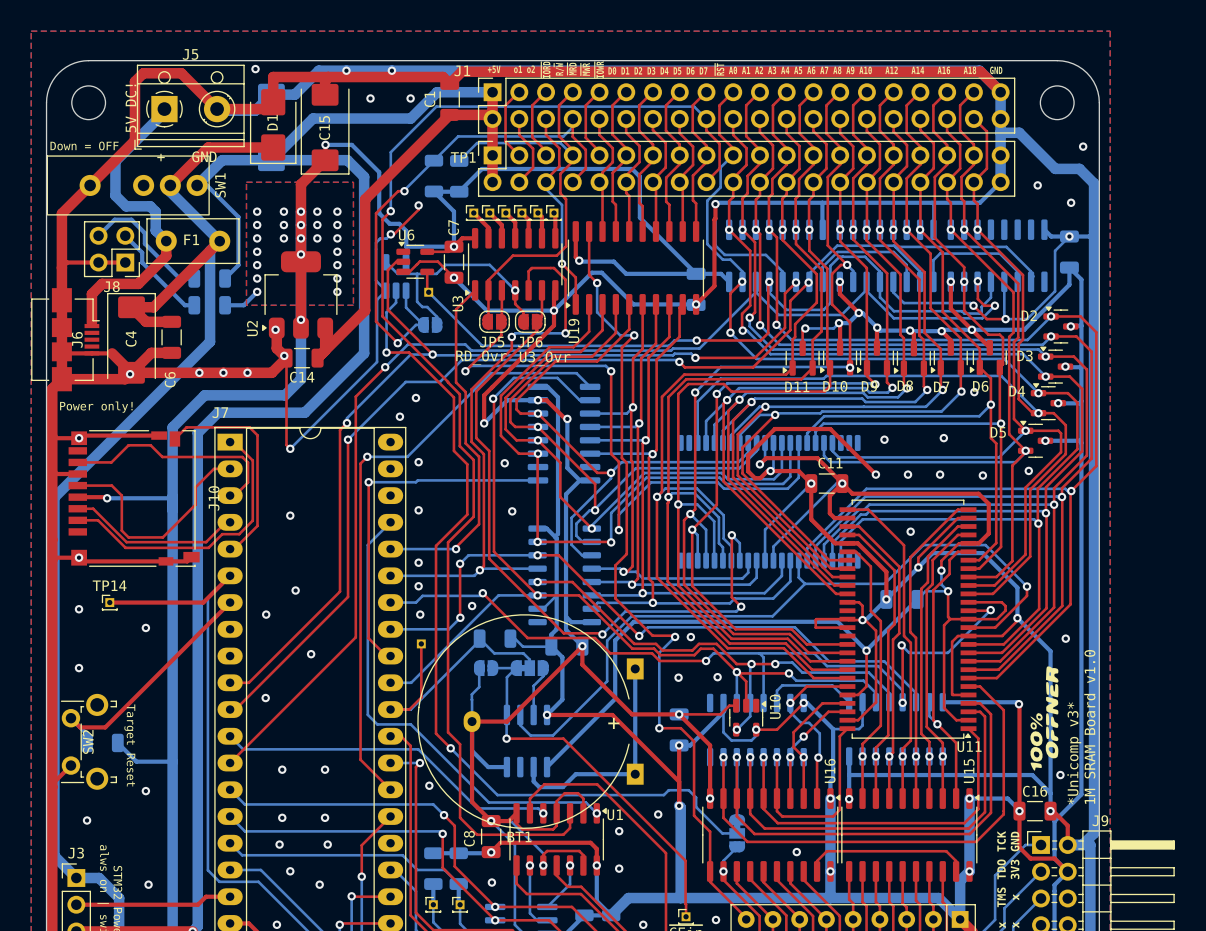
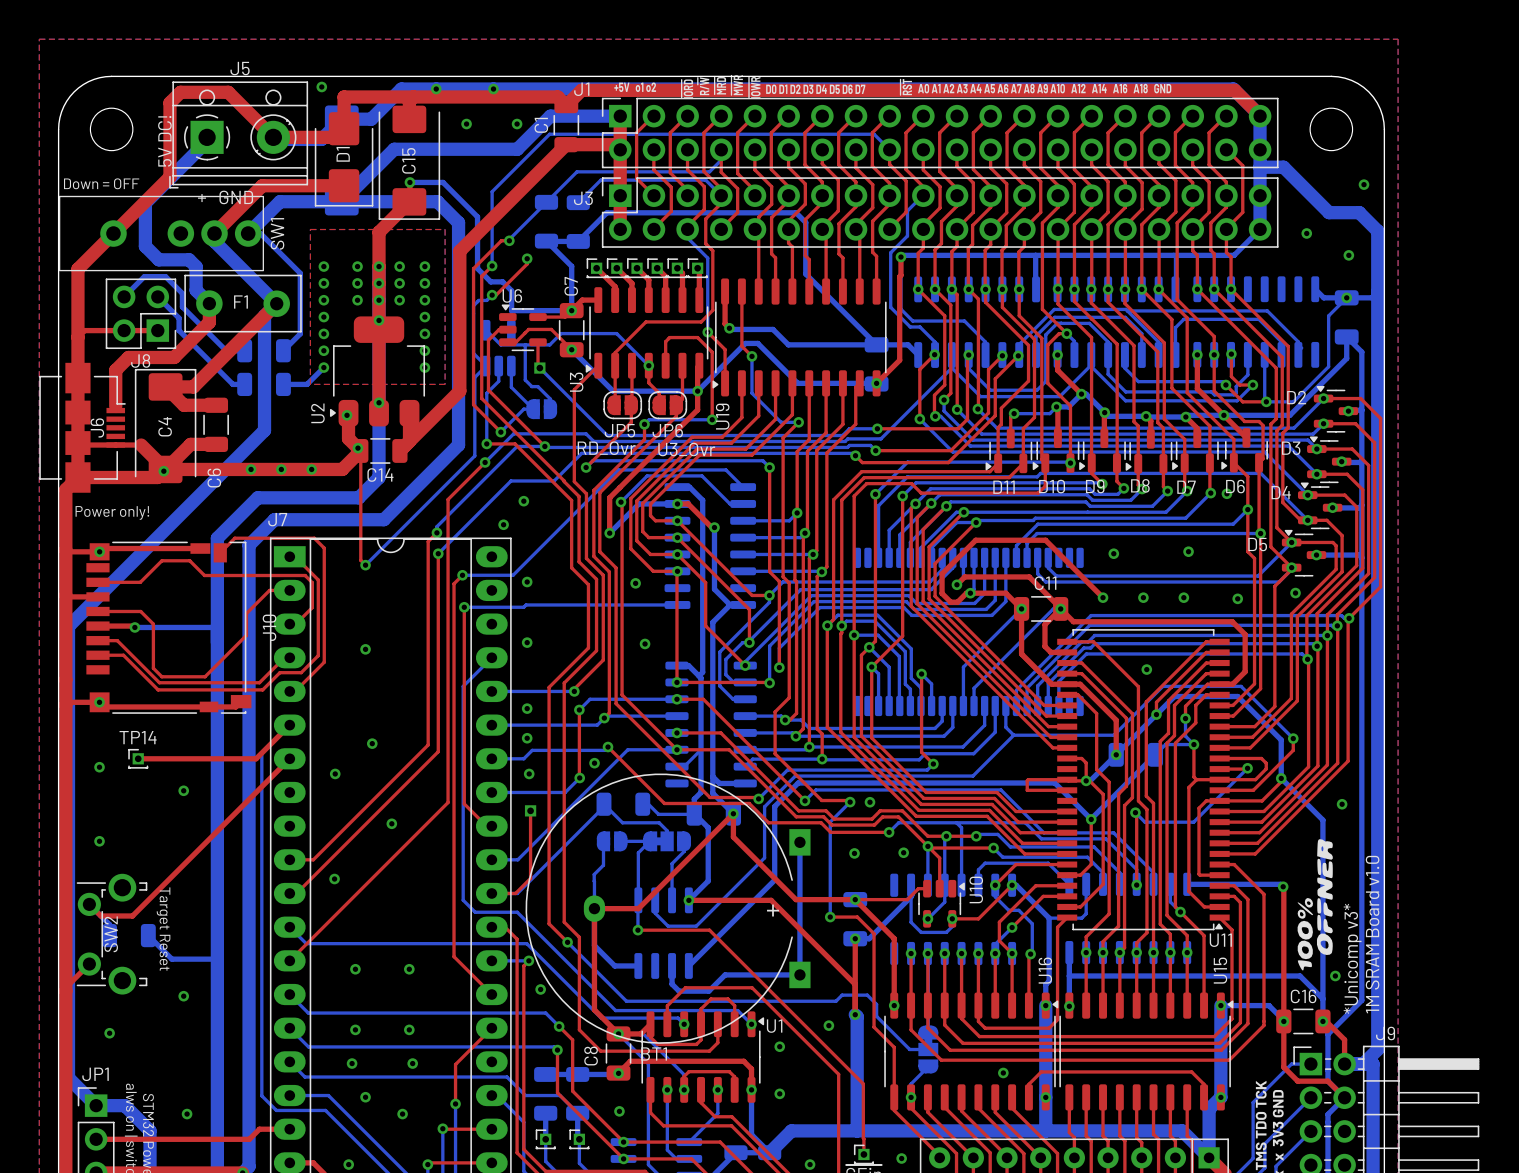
TP1 name: TP1 (463, 157) -> J3 (583, 198)
J3 name: J3 (76, 853) -> JP1 (95, 1074)

